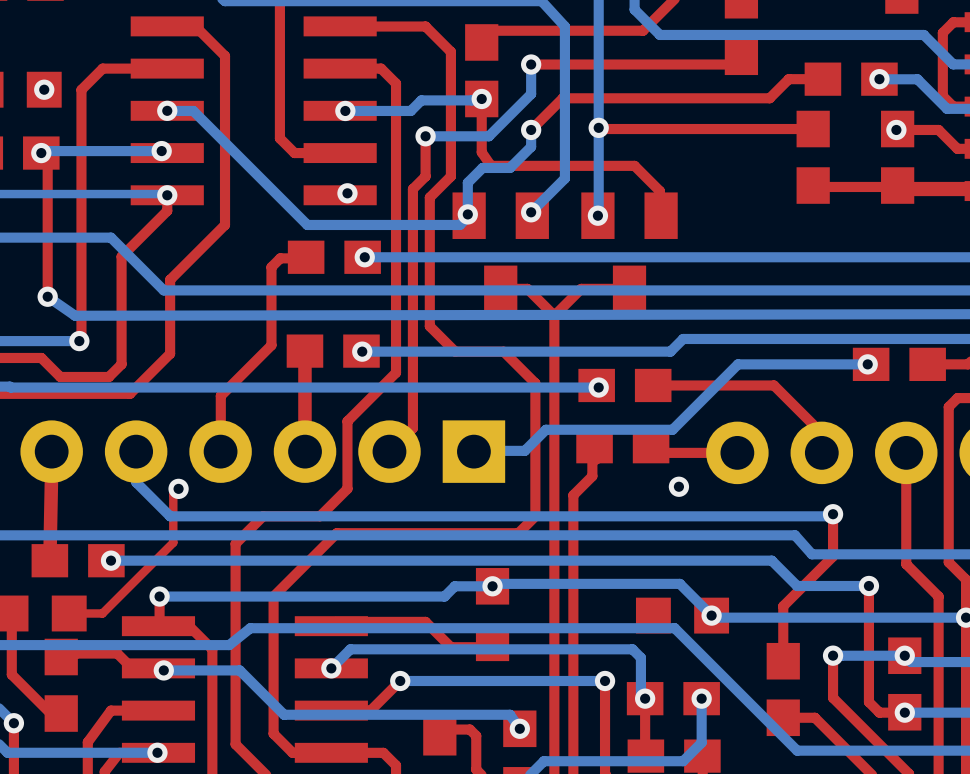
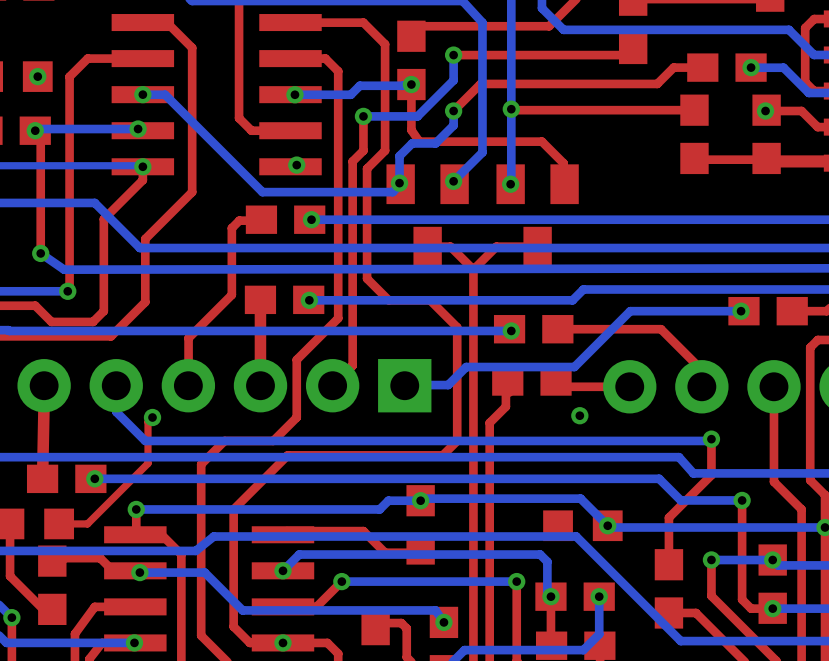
via: none -> (282, 642)

